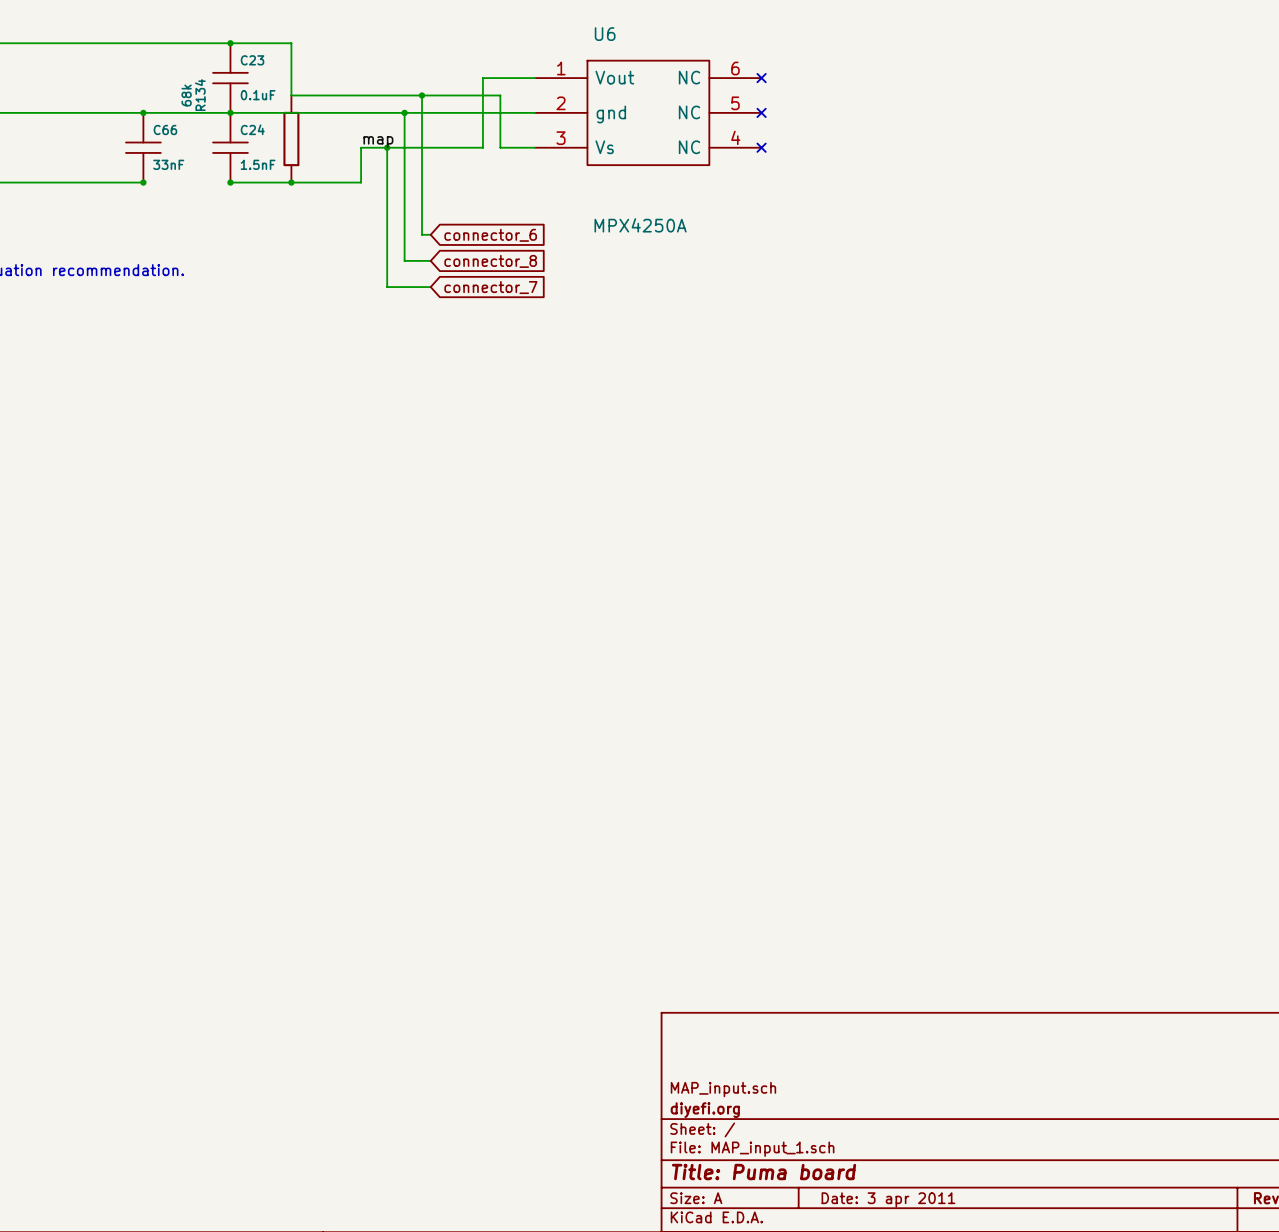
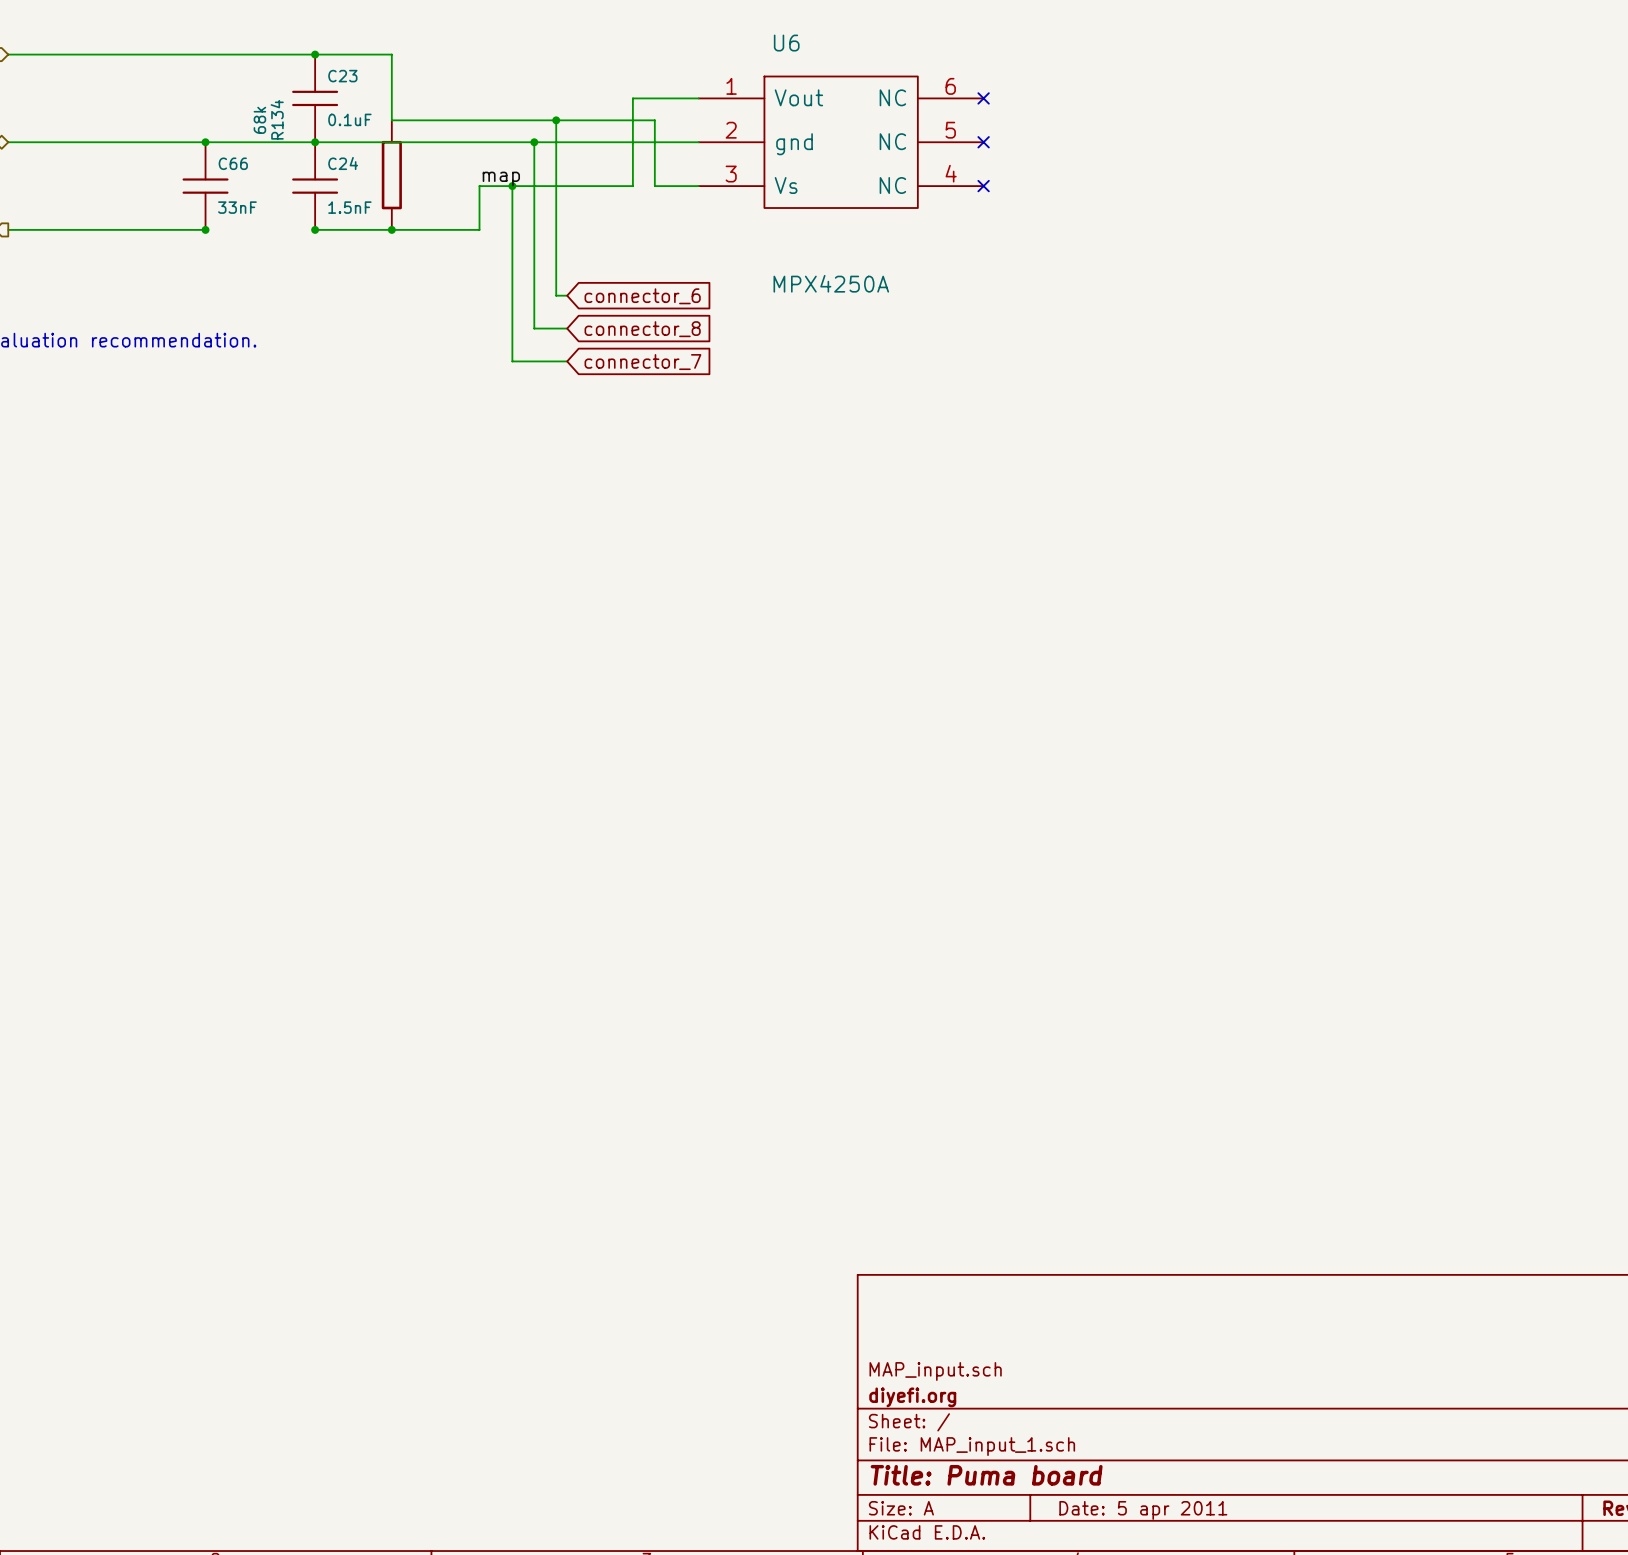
title block: Date: 3 apr 2011 (888, 1199) -> Date: 5 apr 2011 (1143, 1510)

